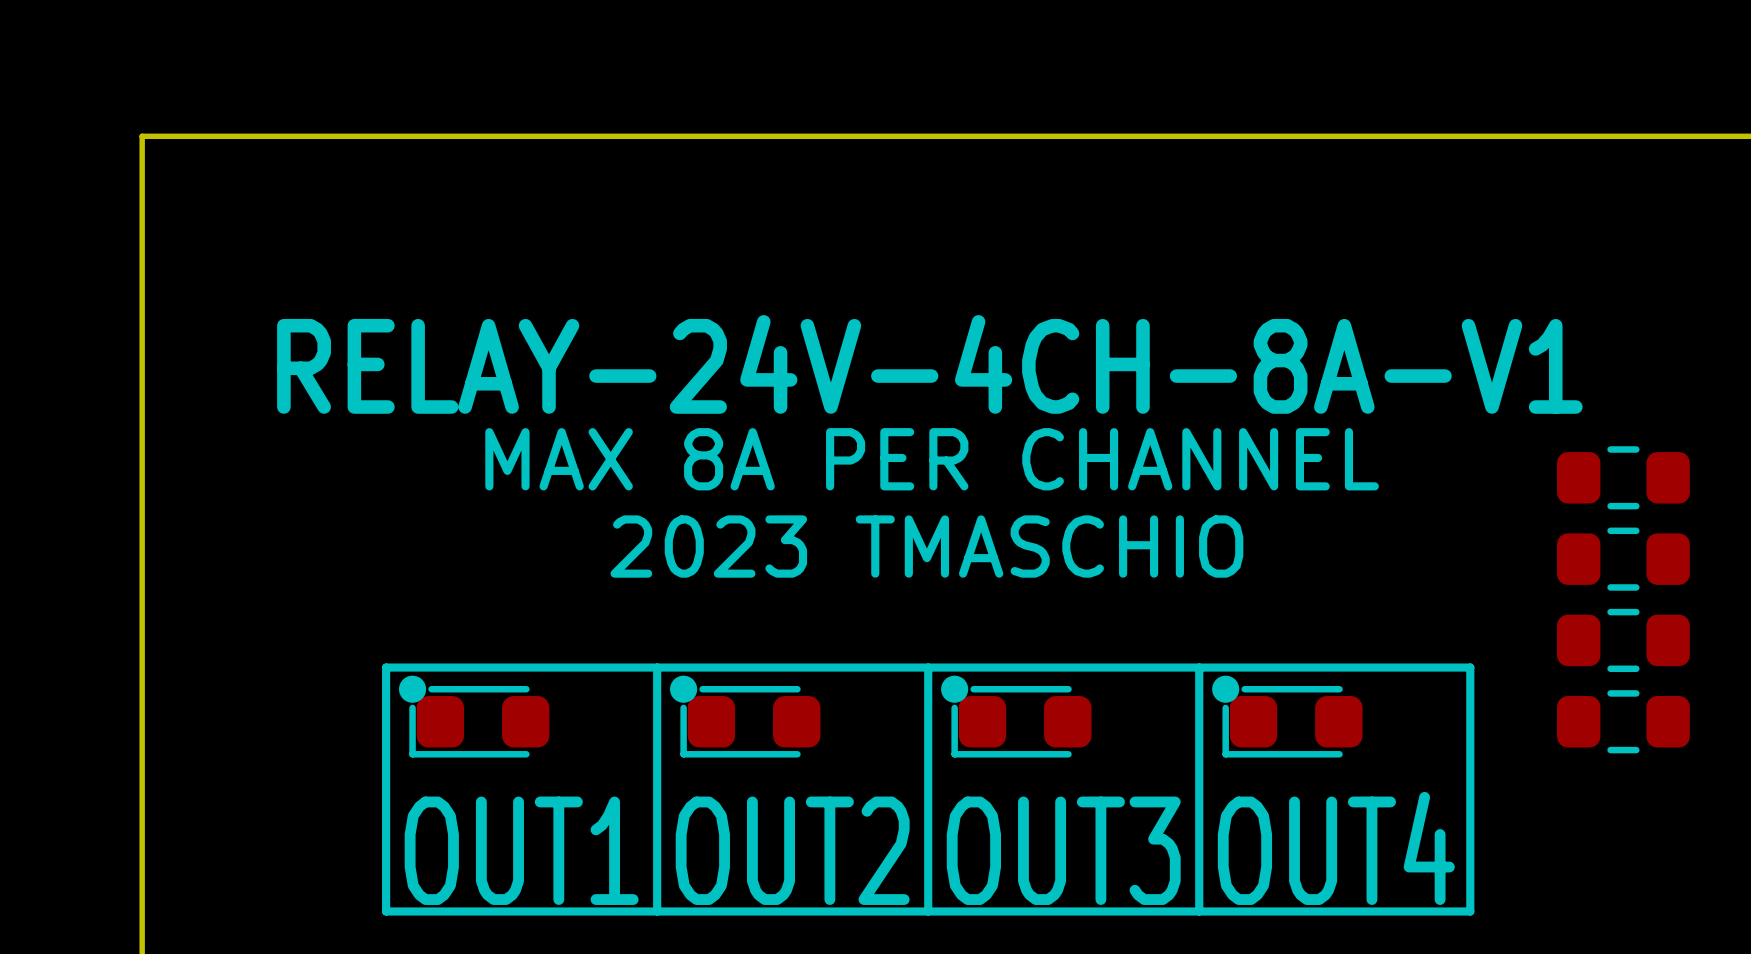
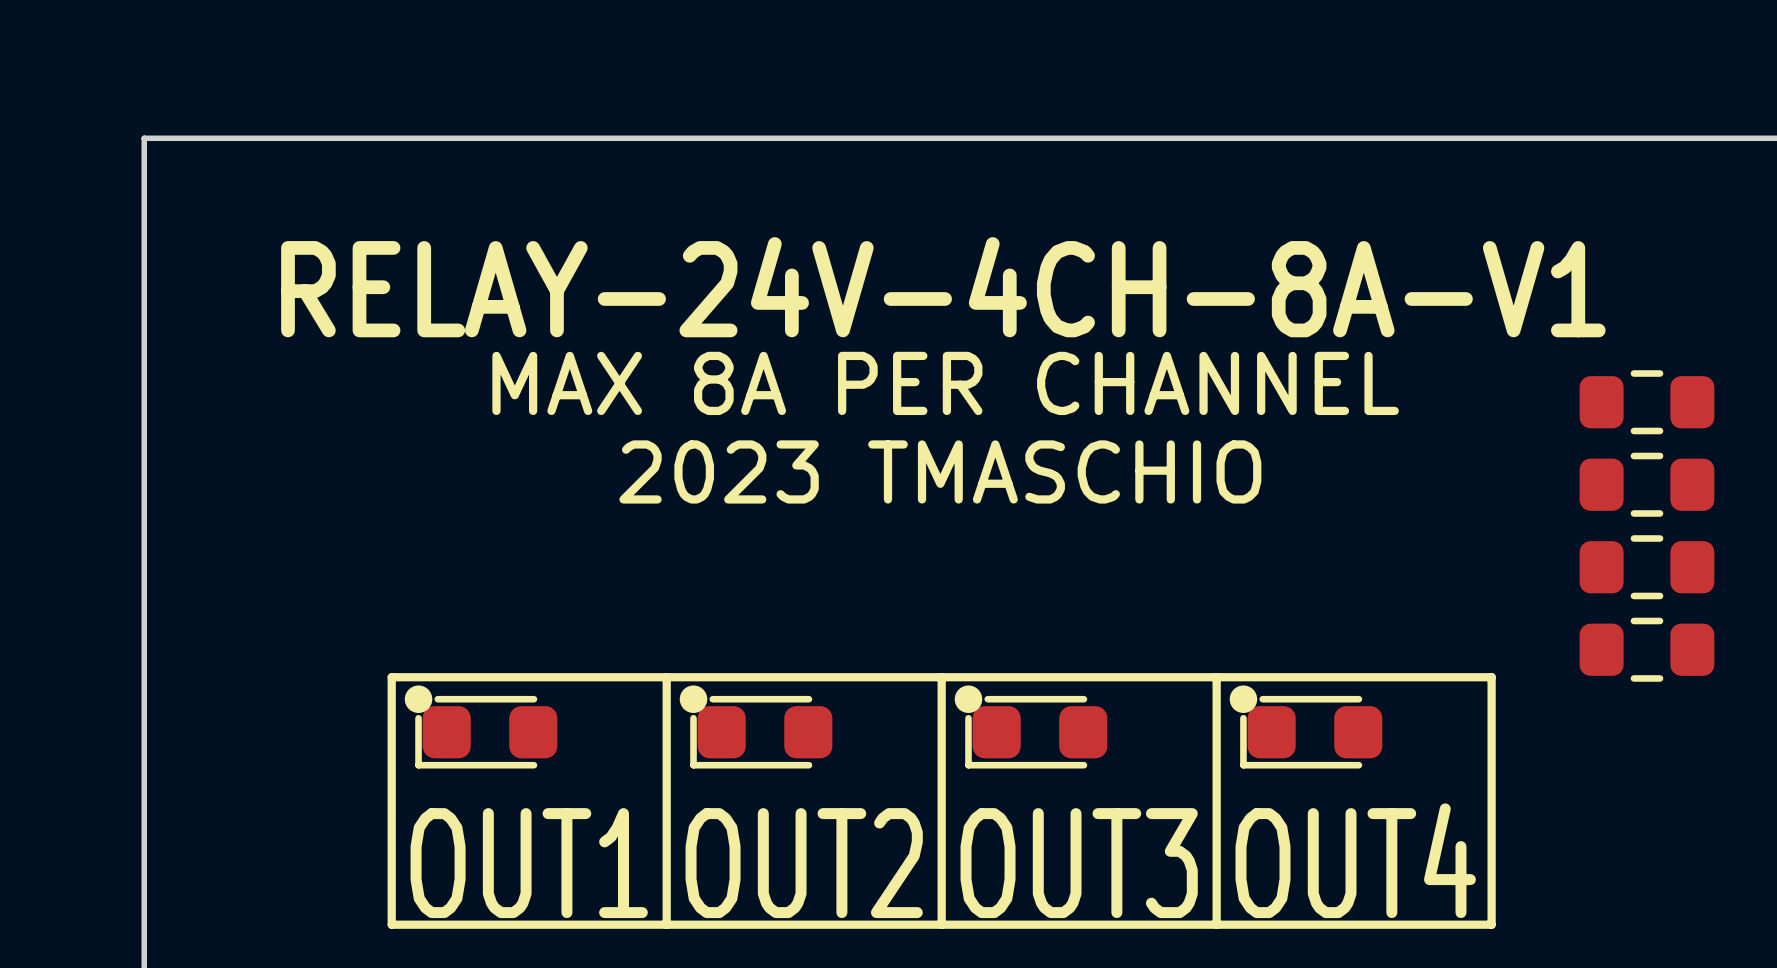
text position: RELAY-24V-4CH-8A-V1 (929, 364) -> RELAY-24V-4CH-8A-V1 (943, 287)
text position: MAX 8A PER CHANNEL (932, 459) -> MAX 8A PER CHANNEL (945, 383)
text position: 2023 TMASCHIO (926, 546) -> 2023 TMASCHIO (940, 471)
part position: (1623, 721) -> (1646, 402)

